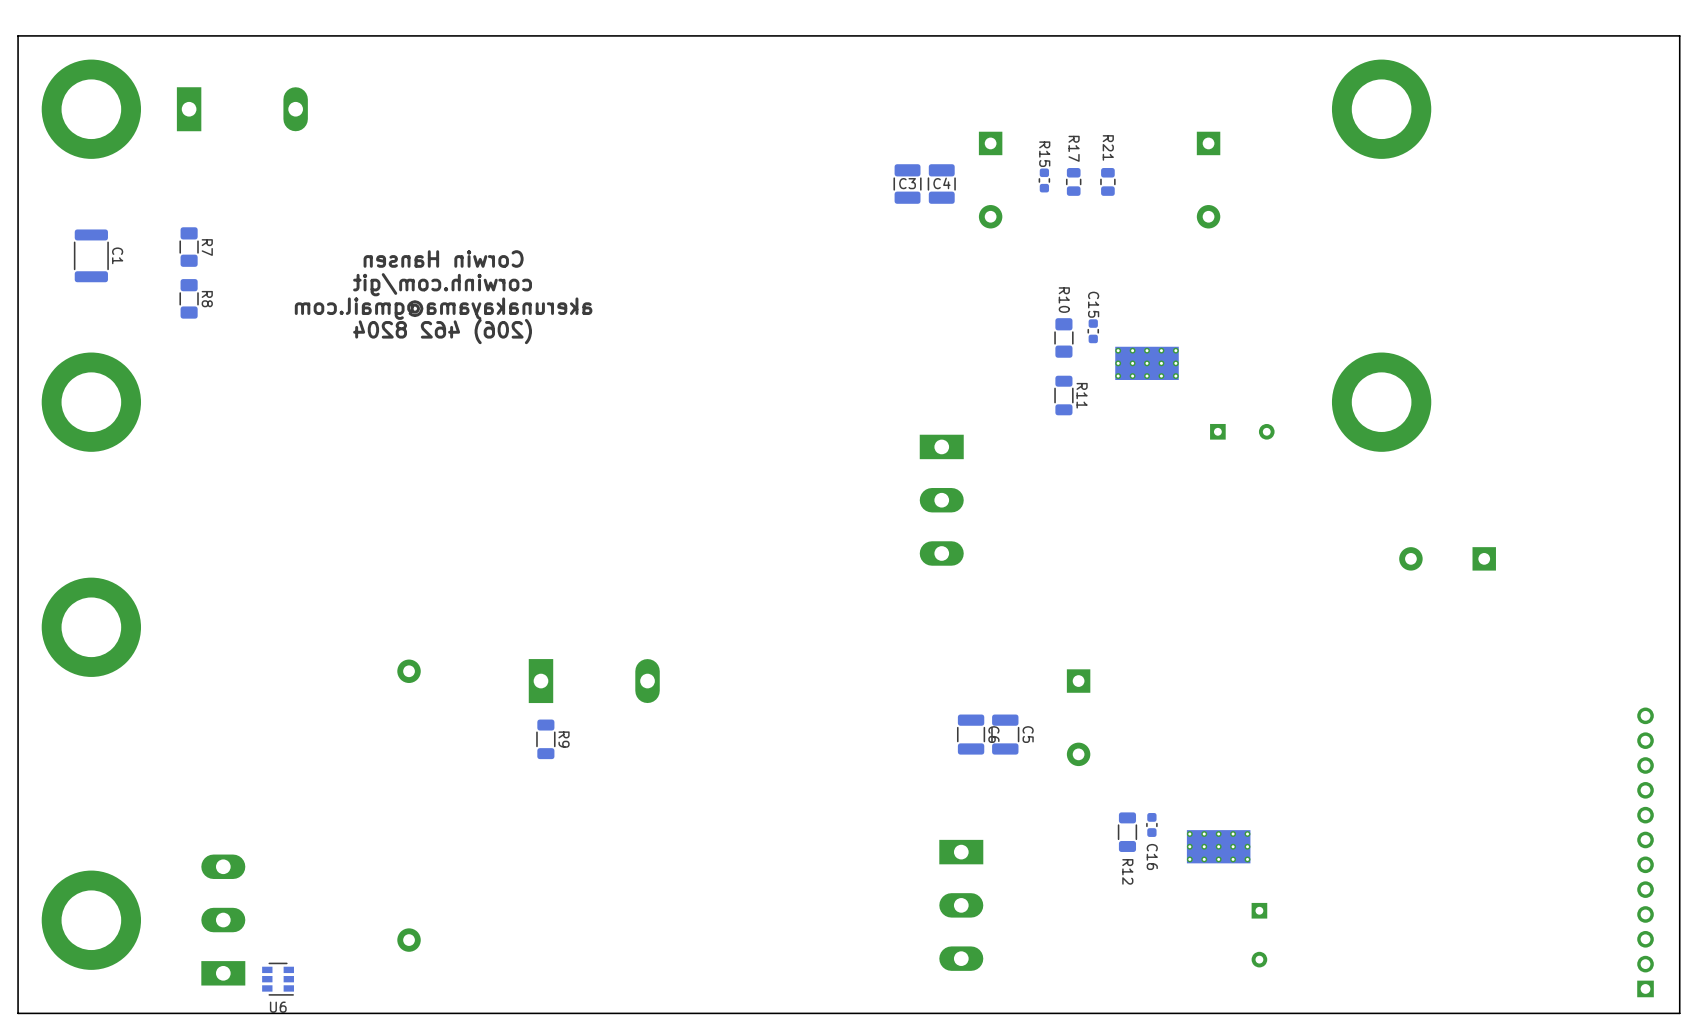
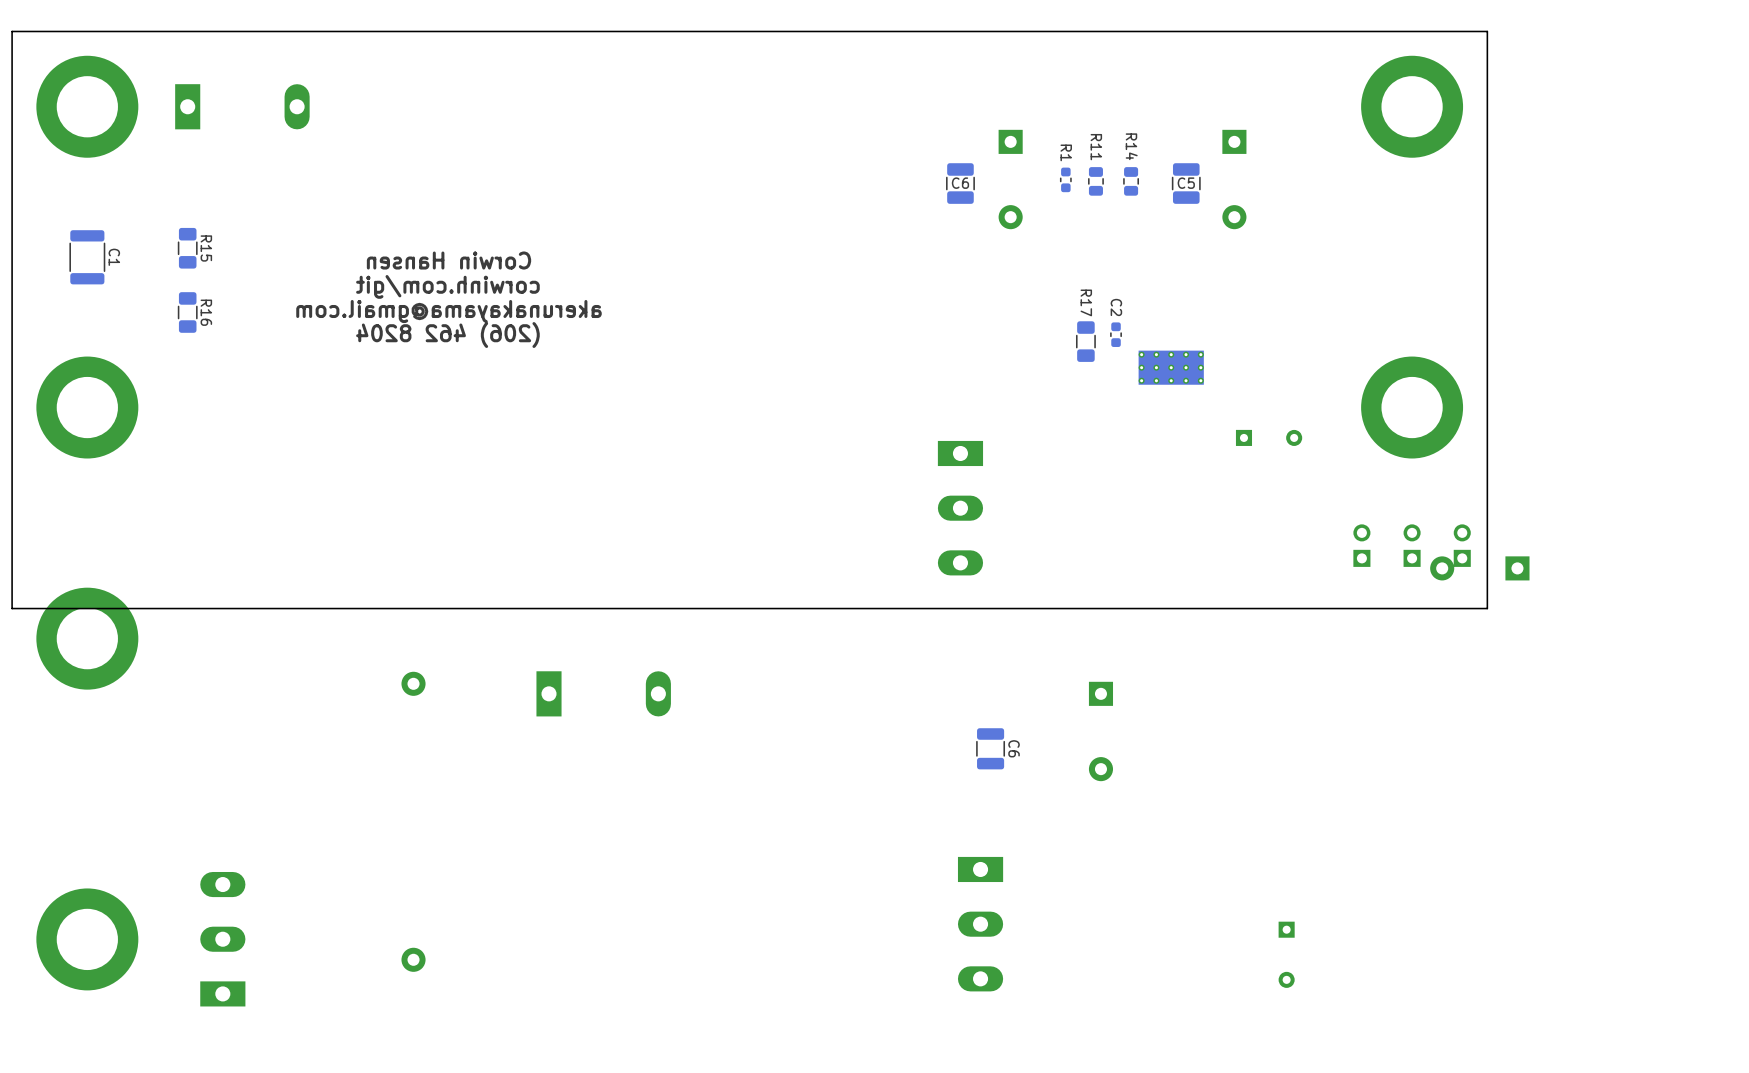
board edge: (1454, 35) (1679, 35) (1679, 1013) (18, 1013) (18, 597) -> (1487, 31) (1487, 608) (12, 608)
R21 name: R21 (1108, 147) -> R14 (1131, 146)
R17 name: R17 (1074, 148) -> R11 (1096, 147)
R15 name: R15 (1044, 154) -> R1 (1066, 152)
C4 name: C4 (941, 183) -> C6 (960, 183)
C3: (907, 184) -> none
R7 name: R7 (207, 247) -> R15 (206, 248)
R8: (189, 298) -> none
R10 name: R10 (1064, 300) -> R17 (1086, 302)
C15 name: C15 (1093, 304) -> C2 (1116, 307)
R16: none -> (187, 312)
R11: (1063, 395) -> none
part: none -> (1361, 545)
part: none -> (1412, 545)
part: none -> (1462, 545)
C5 footprint: [991, 714, 1020, 755] -> [1172, 163, 1201, 204]
C5 name position: C5 (1028, 734) -> C5 (1186, 183)
R9: (545, 739) -> none
C16: (1151, 824) -> none
R12: (1127, 832) -> none
part: (1218, 846) -> none
part: (1645, 852) -> none
U6: (278, 979) -> none

